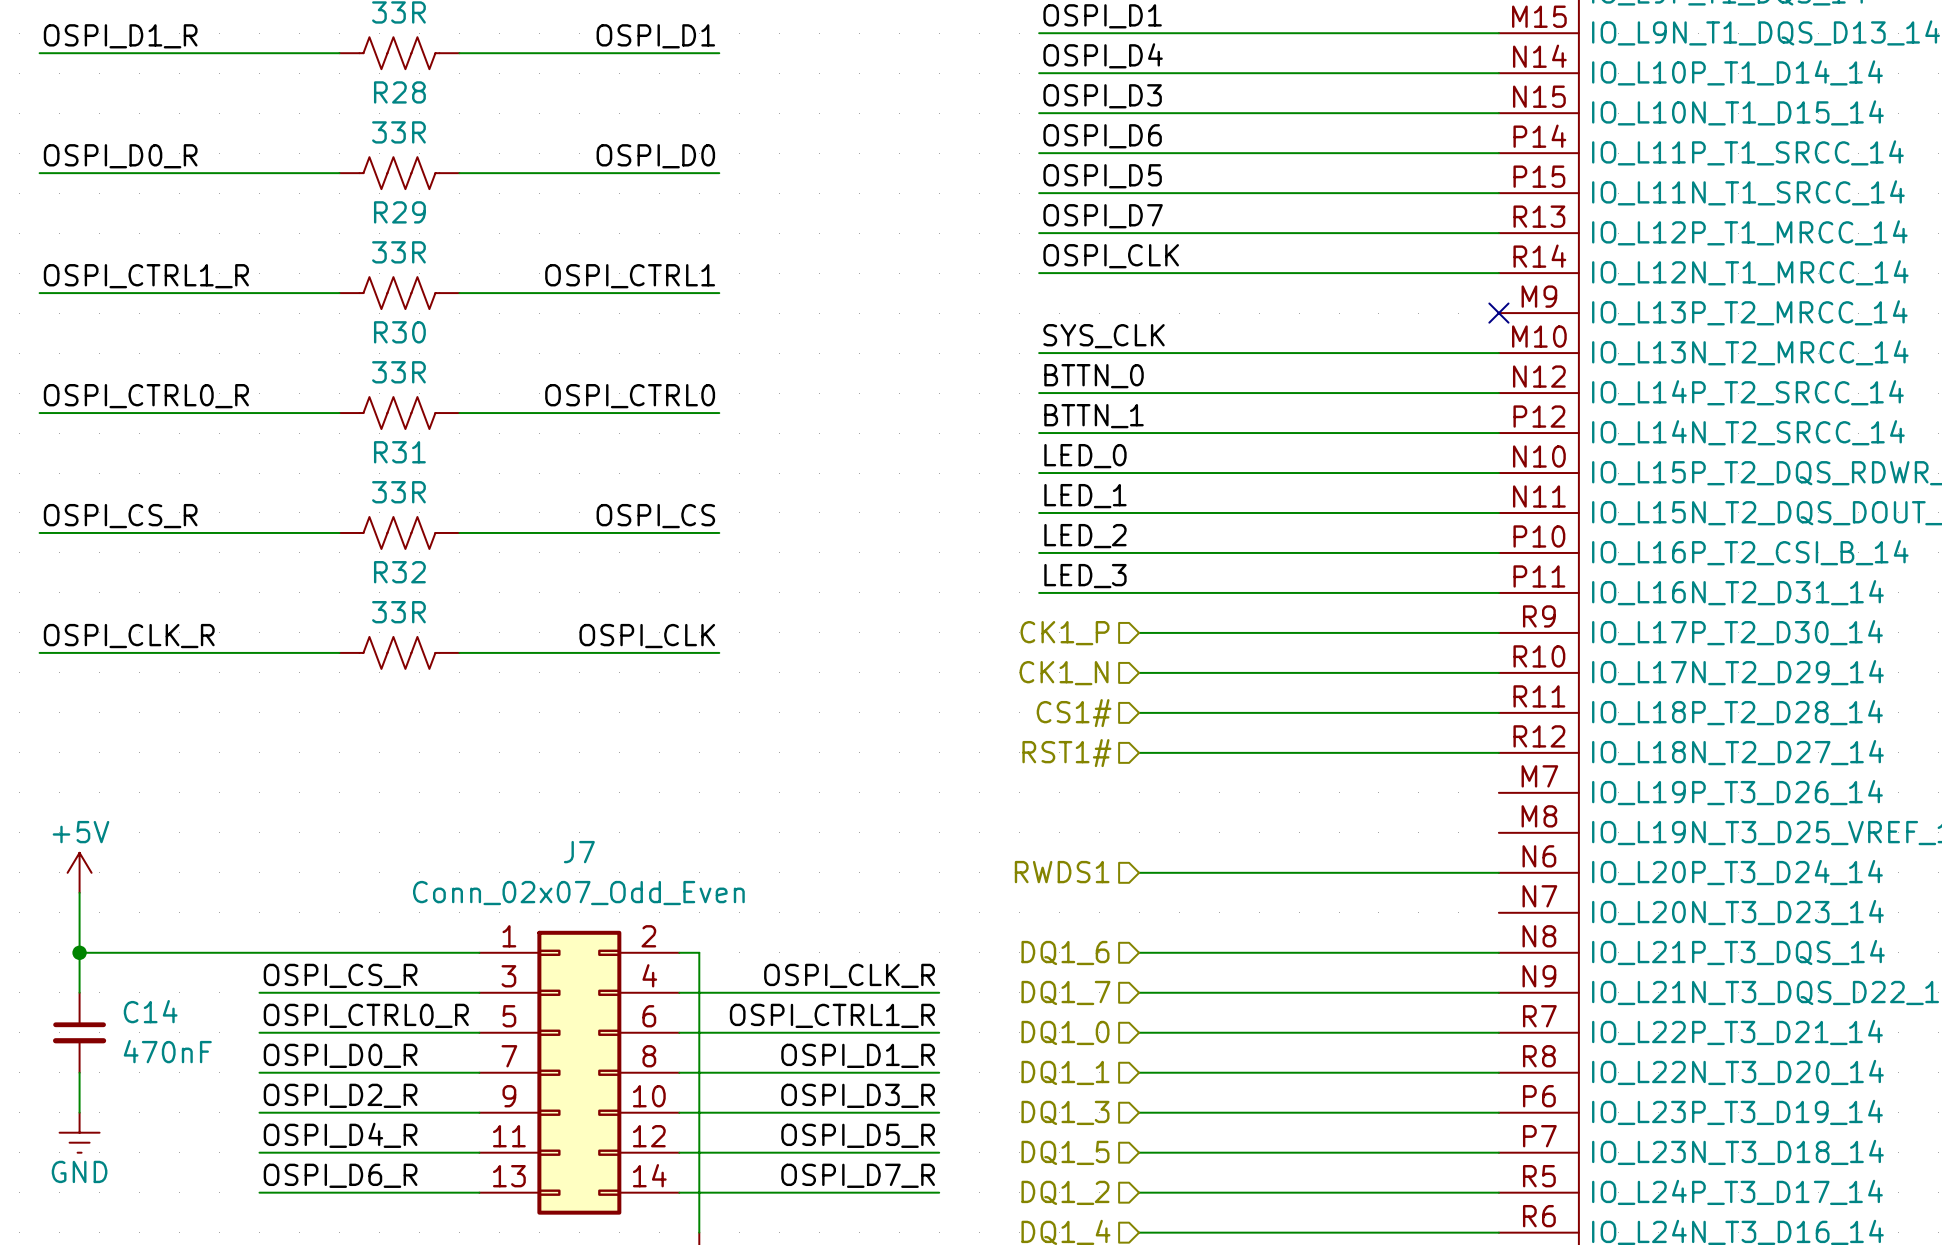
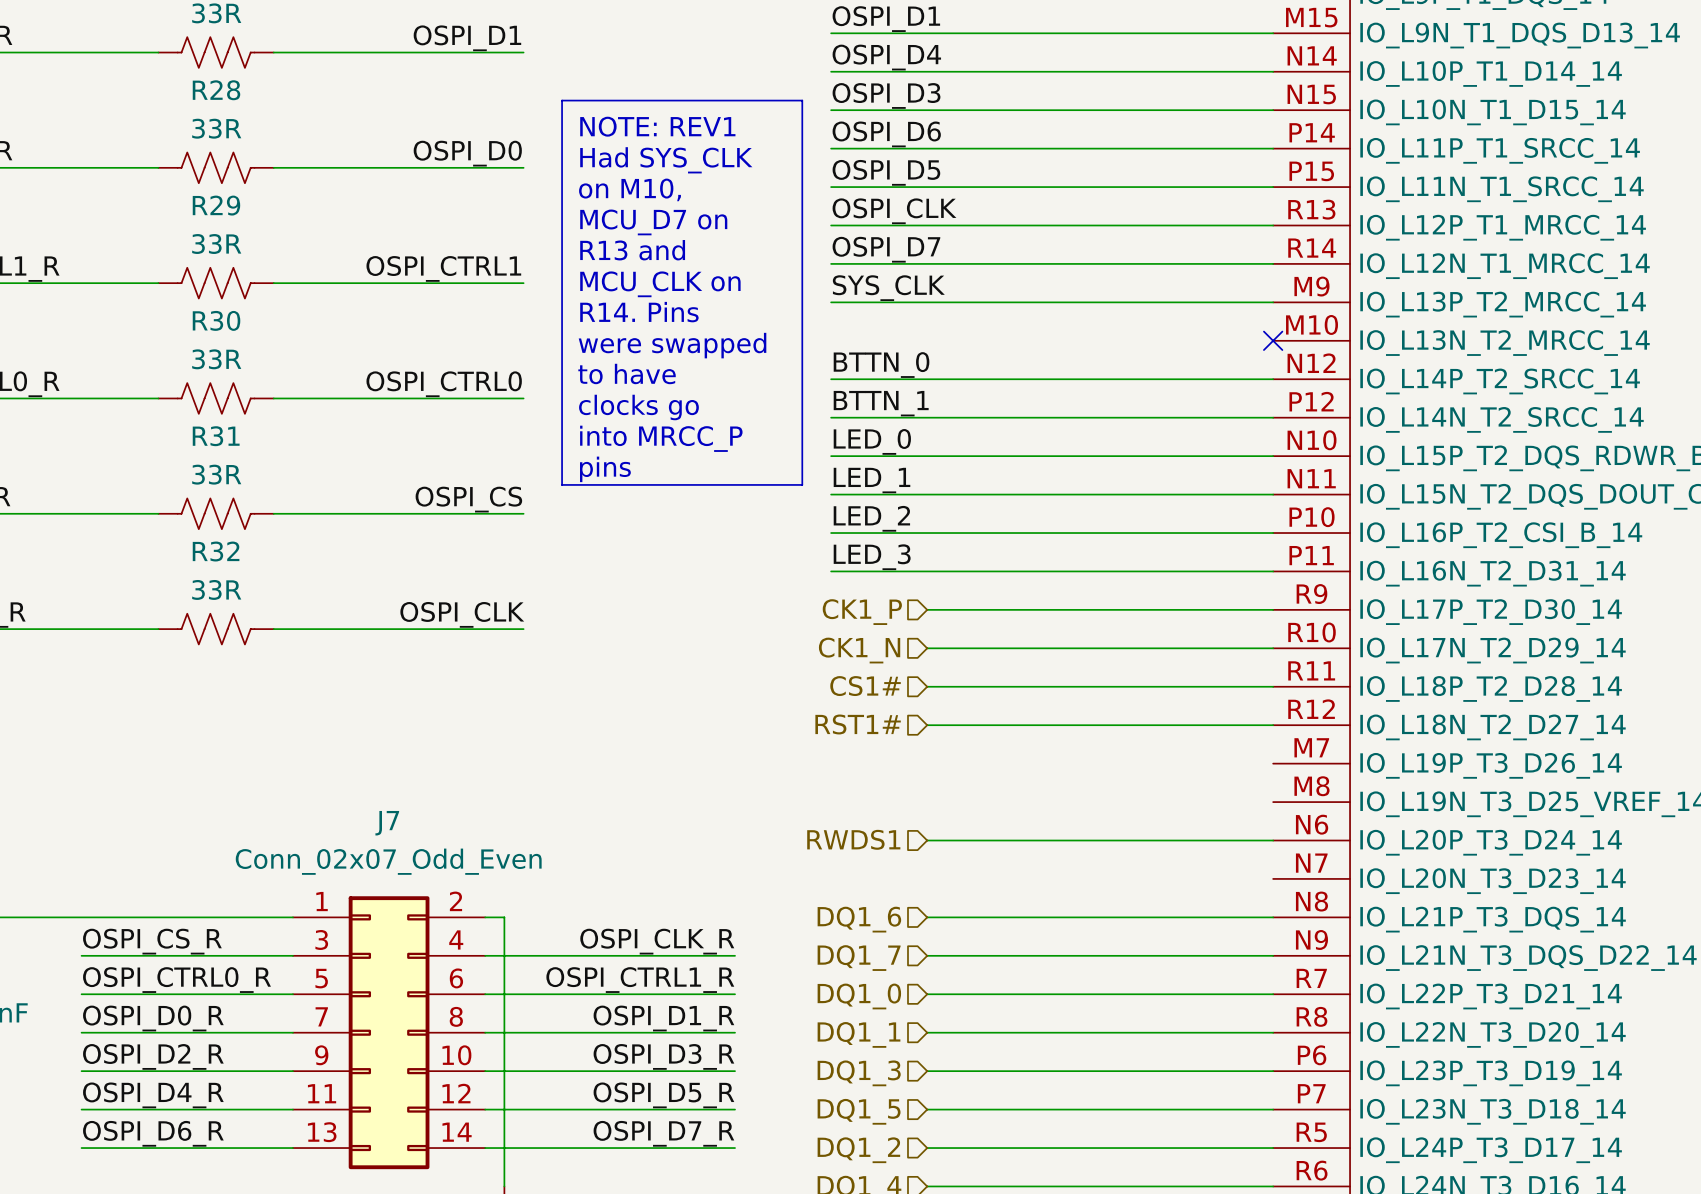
line: none -> (562, 100) (802, 100) (802, 484) (562, 484) (562, 100)
text: none -> NOTE: REV1 (657, 126)
text: none -> Had SYS_CLK (666, 160)
text: none -> on M10, (630, 189)
label: OSPI_D7 (1103, 216) -> OSPI_CLK (894, 211)
text: none -> MCU_D7 on (653, 222)
label: OSPI_CLK (1111, 256) -> OSPI_D7 (886, 249)
text: none -> R13 and (632, 250)
text: none -> MCU_CLK on (660, 284)
no-connect mark position: (1498, 313) -> (1273, 340)
text: none -> R14. Pins (639, 312)
label position: SYS_CLK (1104, 336) -> SYS_CLK (888, 288)
wire: (1039, 353) (1498, 353) -> (831, 302) (1273, 302)
text: none -> were swapped (672, 345)
text: none -> to have (627, 373)
text: none -> clocks go (638, 407)
text: none -> into MRCC_P (661, 438)
text: none -> pins (605, 469)

